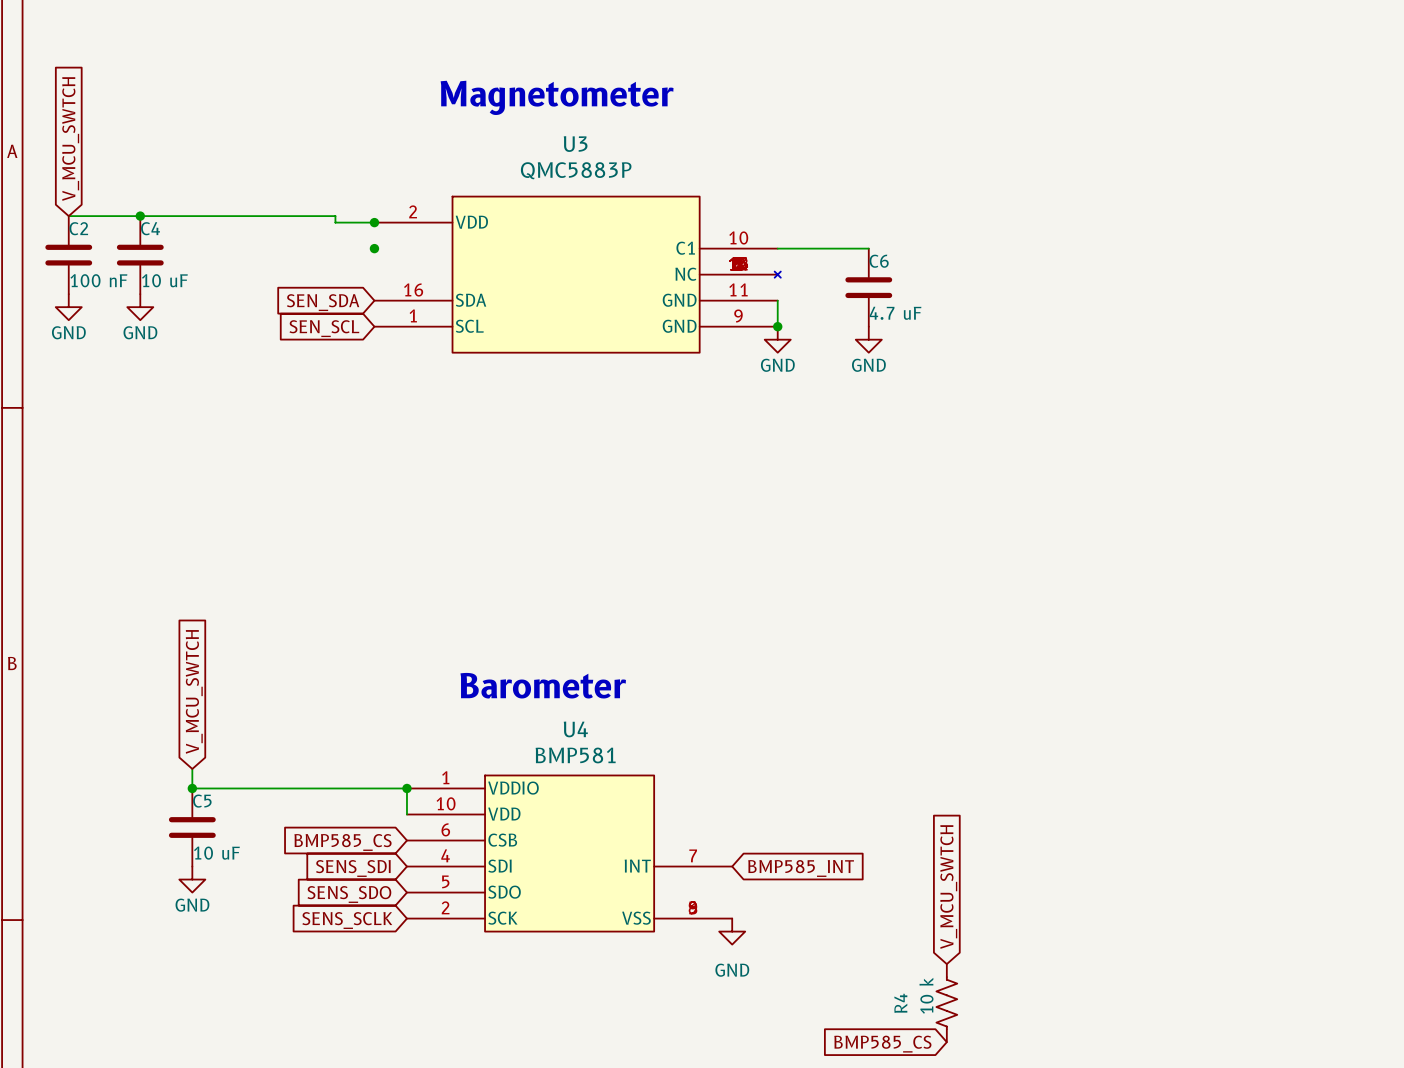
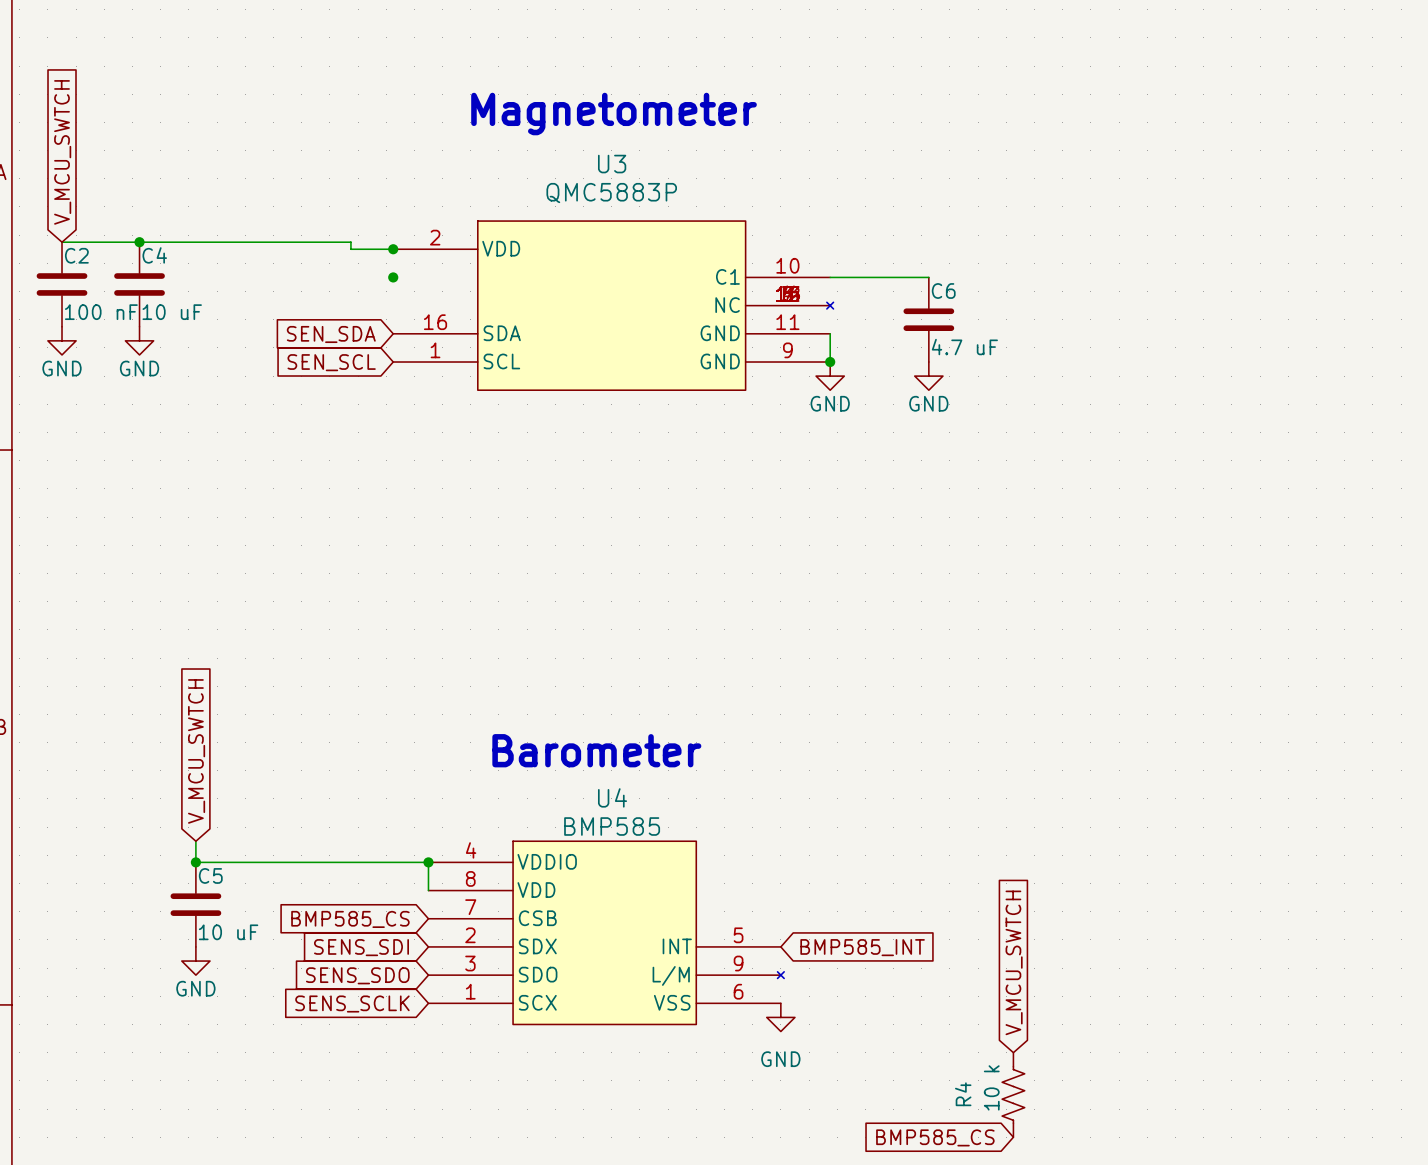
U4 value: BMP581 (575, 755) -> BMP585 (612, 826)
U4 symbol: [406, 775, 733, 932] -> [428, 841, 785, 1025]

